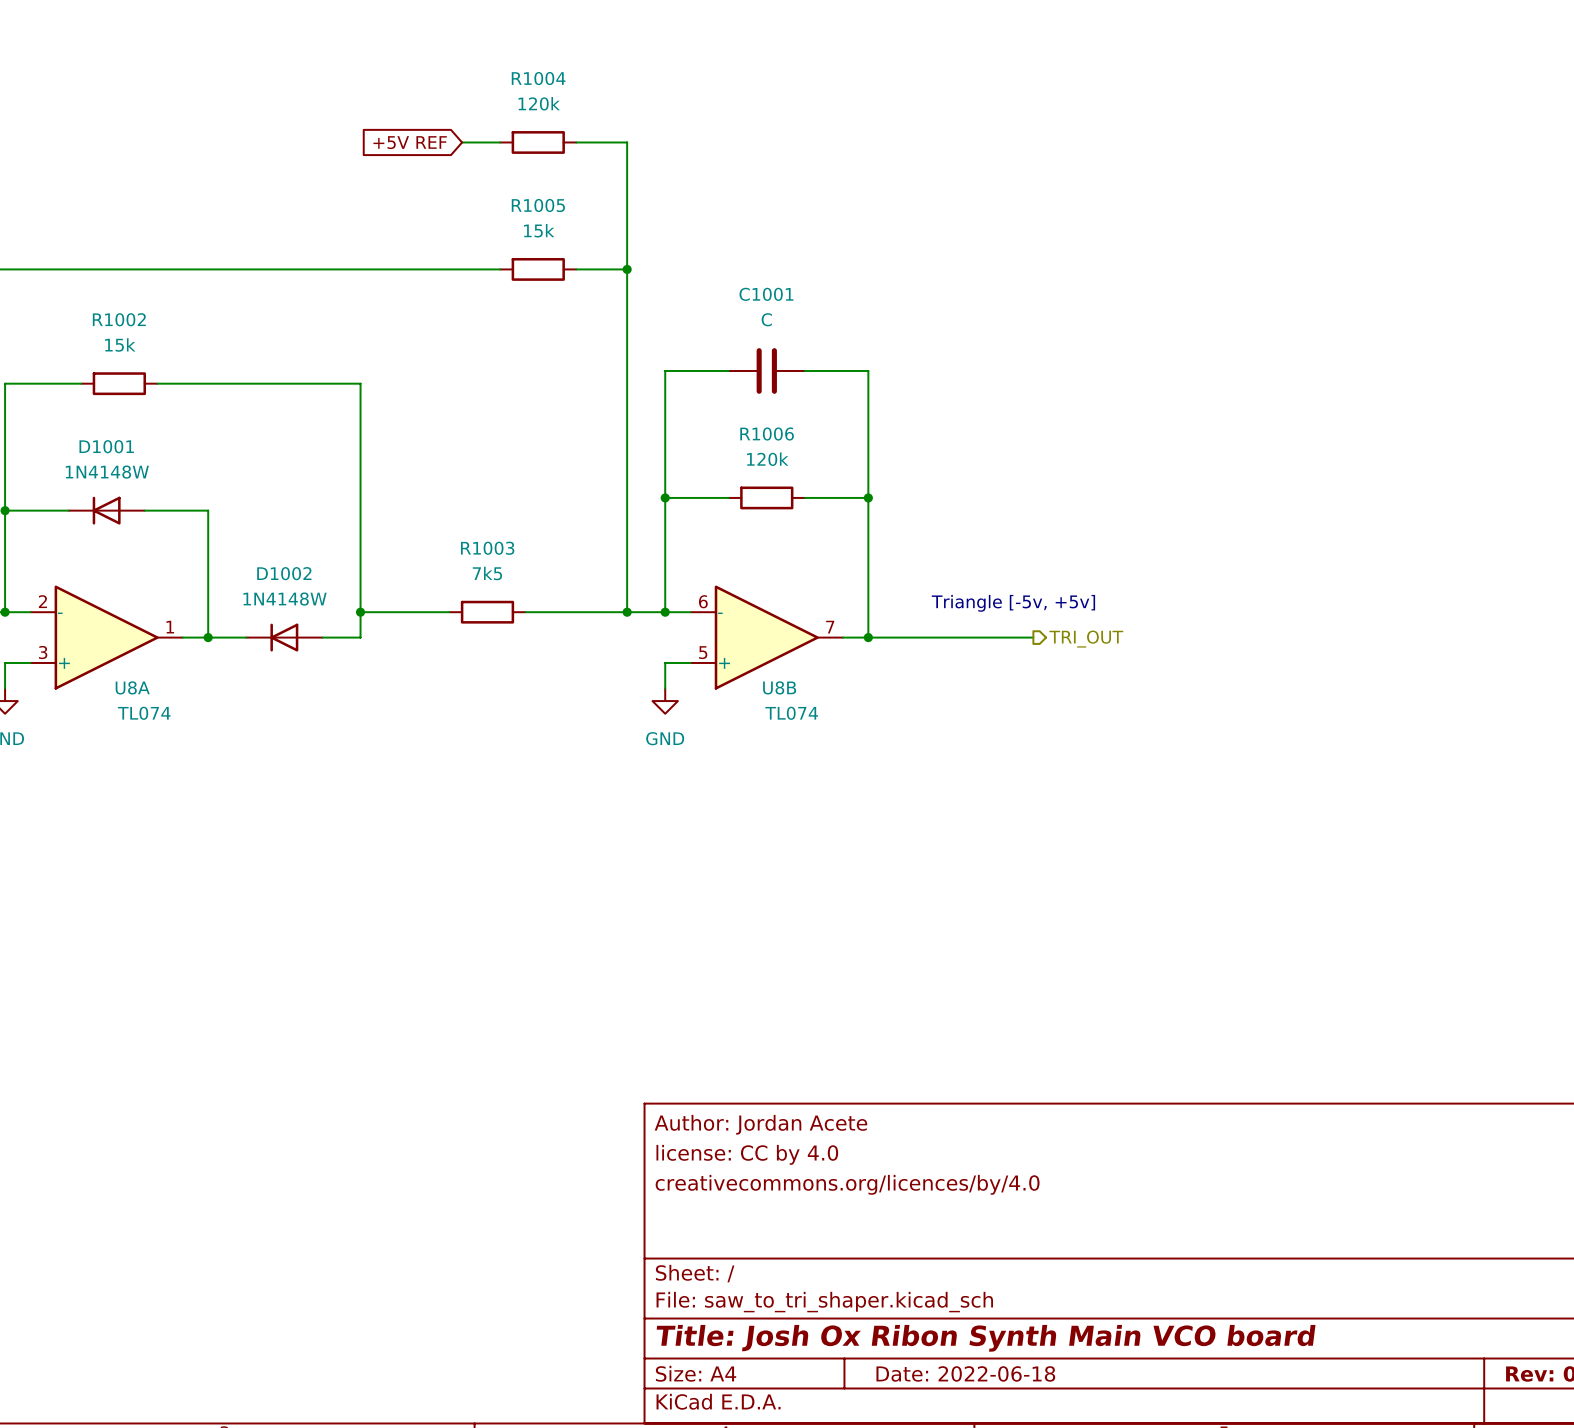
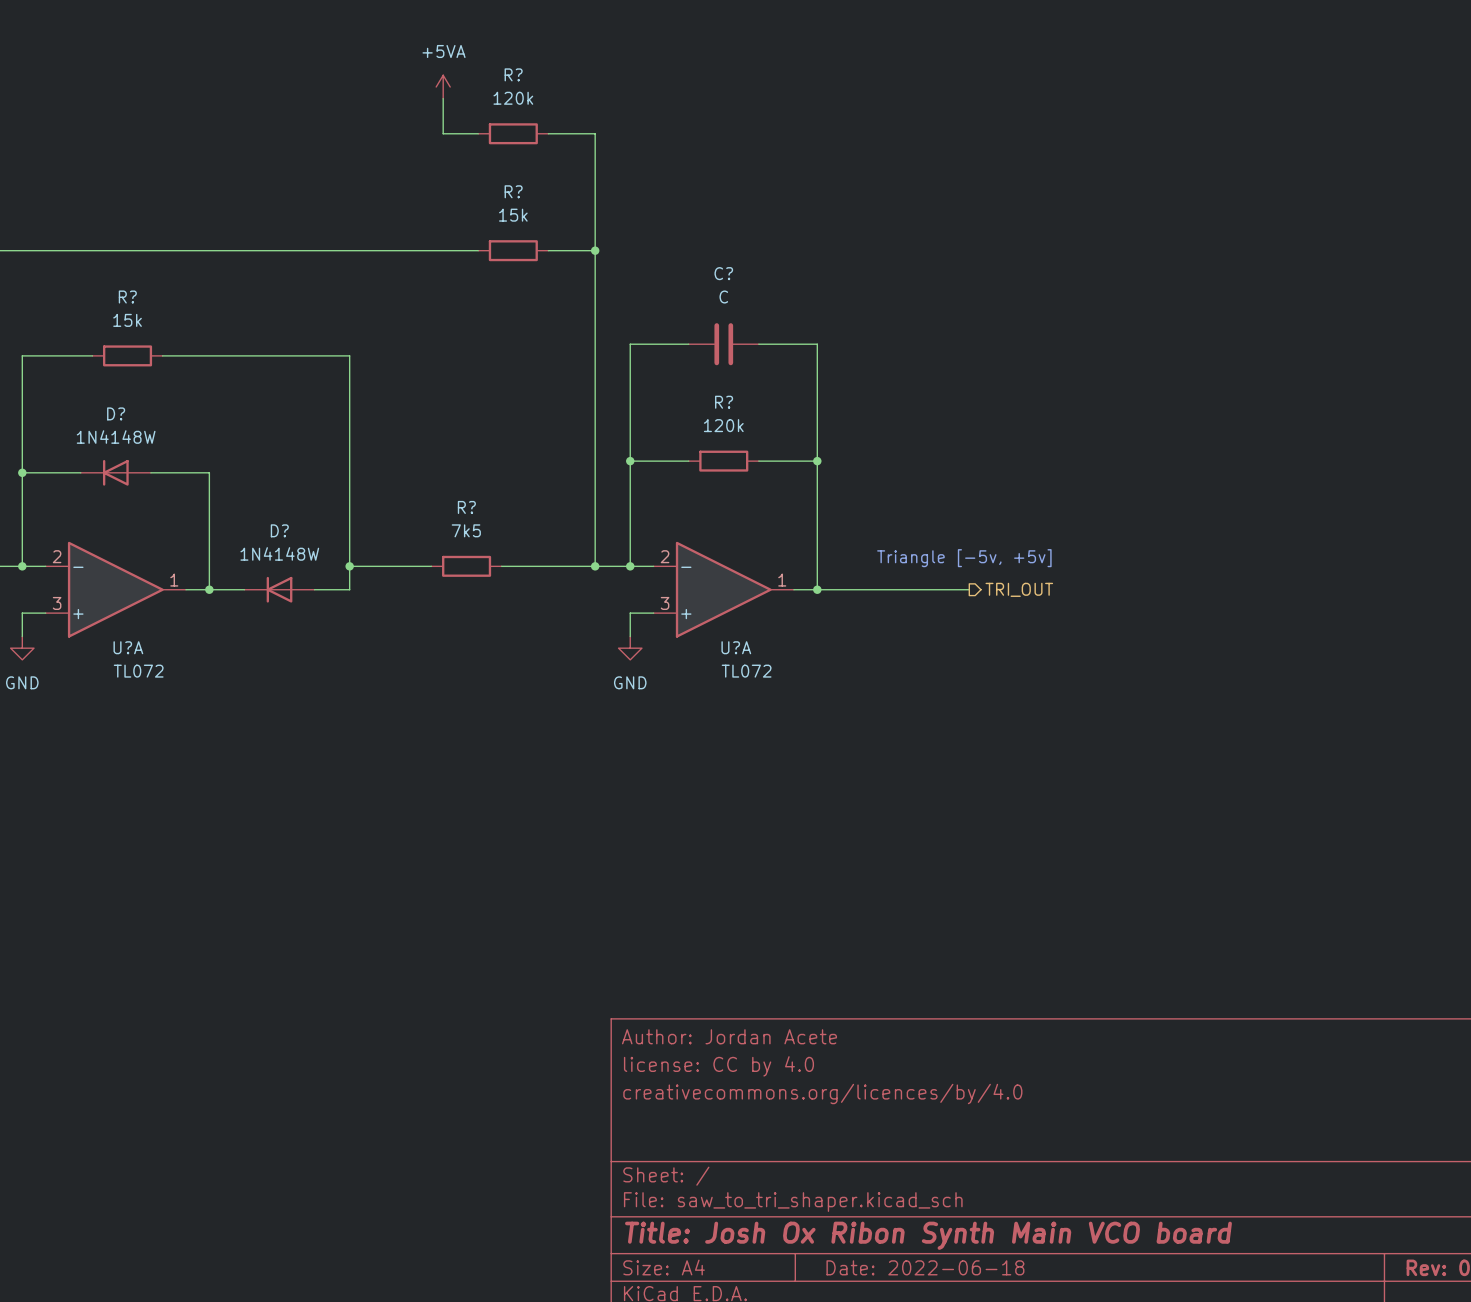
R1004 name: R1004 (538, 78) -> R? (513, 74)
power symbol: none -> +5VA (443, 87)
wire: none -> (443, 98) (443, 133)
global label: +5V REF (410, 142) -> none
R1005 name: R1005 (538, 205) -> R? (513, 191)
C1001 name: C1001 (766, 294) -> C? (723, 273)
R1002 name: R1002 (119, 319) -> R? (127, 297)
R1006 name: R1006 (767, 434) -> R? (724, 402)
D1001 name: D1001 (106, 446) -> D? (116, 413)
R1003 name: R1003 (487, 548) -> R? (466, 507)
D1002 name: D1002 (284, 573) -> D? (279, 530)
U8B pin number: 6 (703, 601) -> 2 (665, 556)
U8B pin number: 7 (830, 627) -> 1 (782, 580)
U8B pin number: 5 (703, 652) -> 3 (665, 603)
U8A name: U8A (132, 687) -> U?A (128, 647)
U8B name: U8B (779, 687) -> U?A (736, 647)
U8A value: TL074 (144, 713) -> TL072 (138, 671)
U8B value: TL074 (791, 713) -> TL072 (746, 671)

